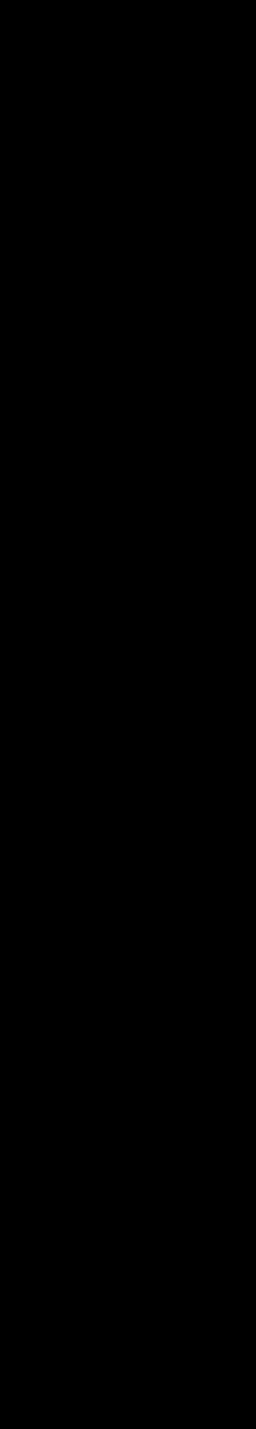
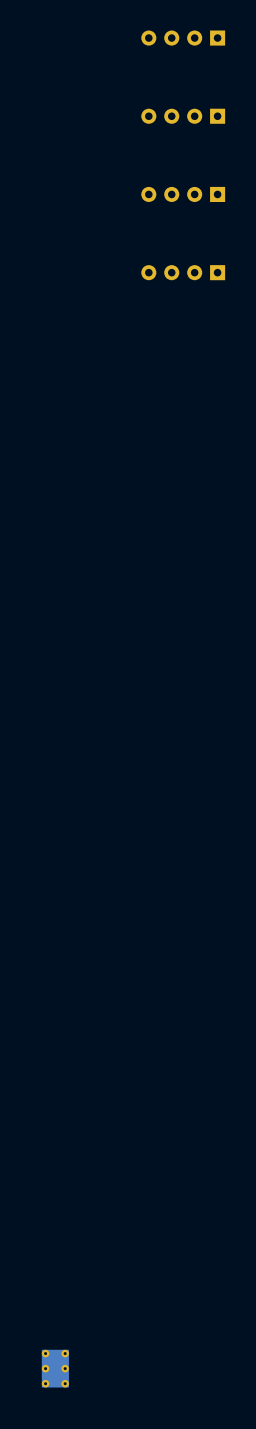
part: none -> (183, 38)
part: none -> (183, 116)
part: none -> (183, 194)
part: none -> (183, 272)
part: none -> (55, 1368)

